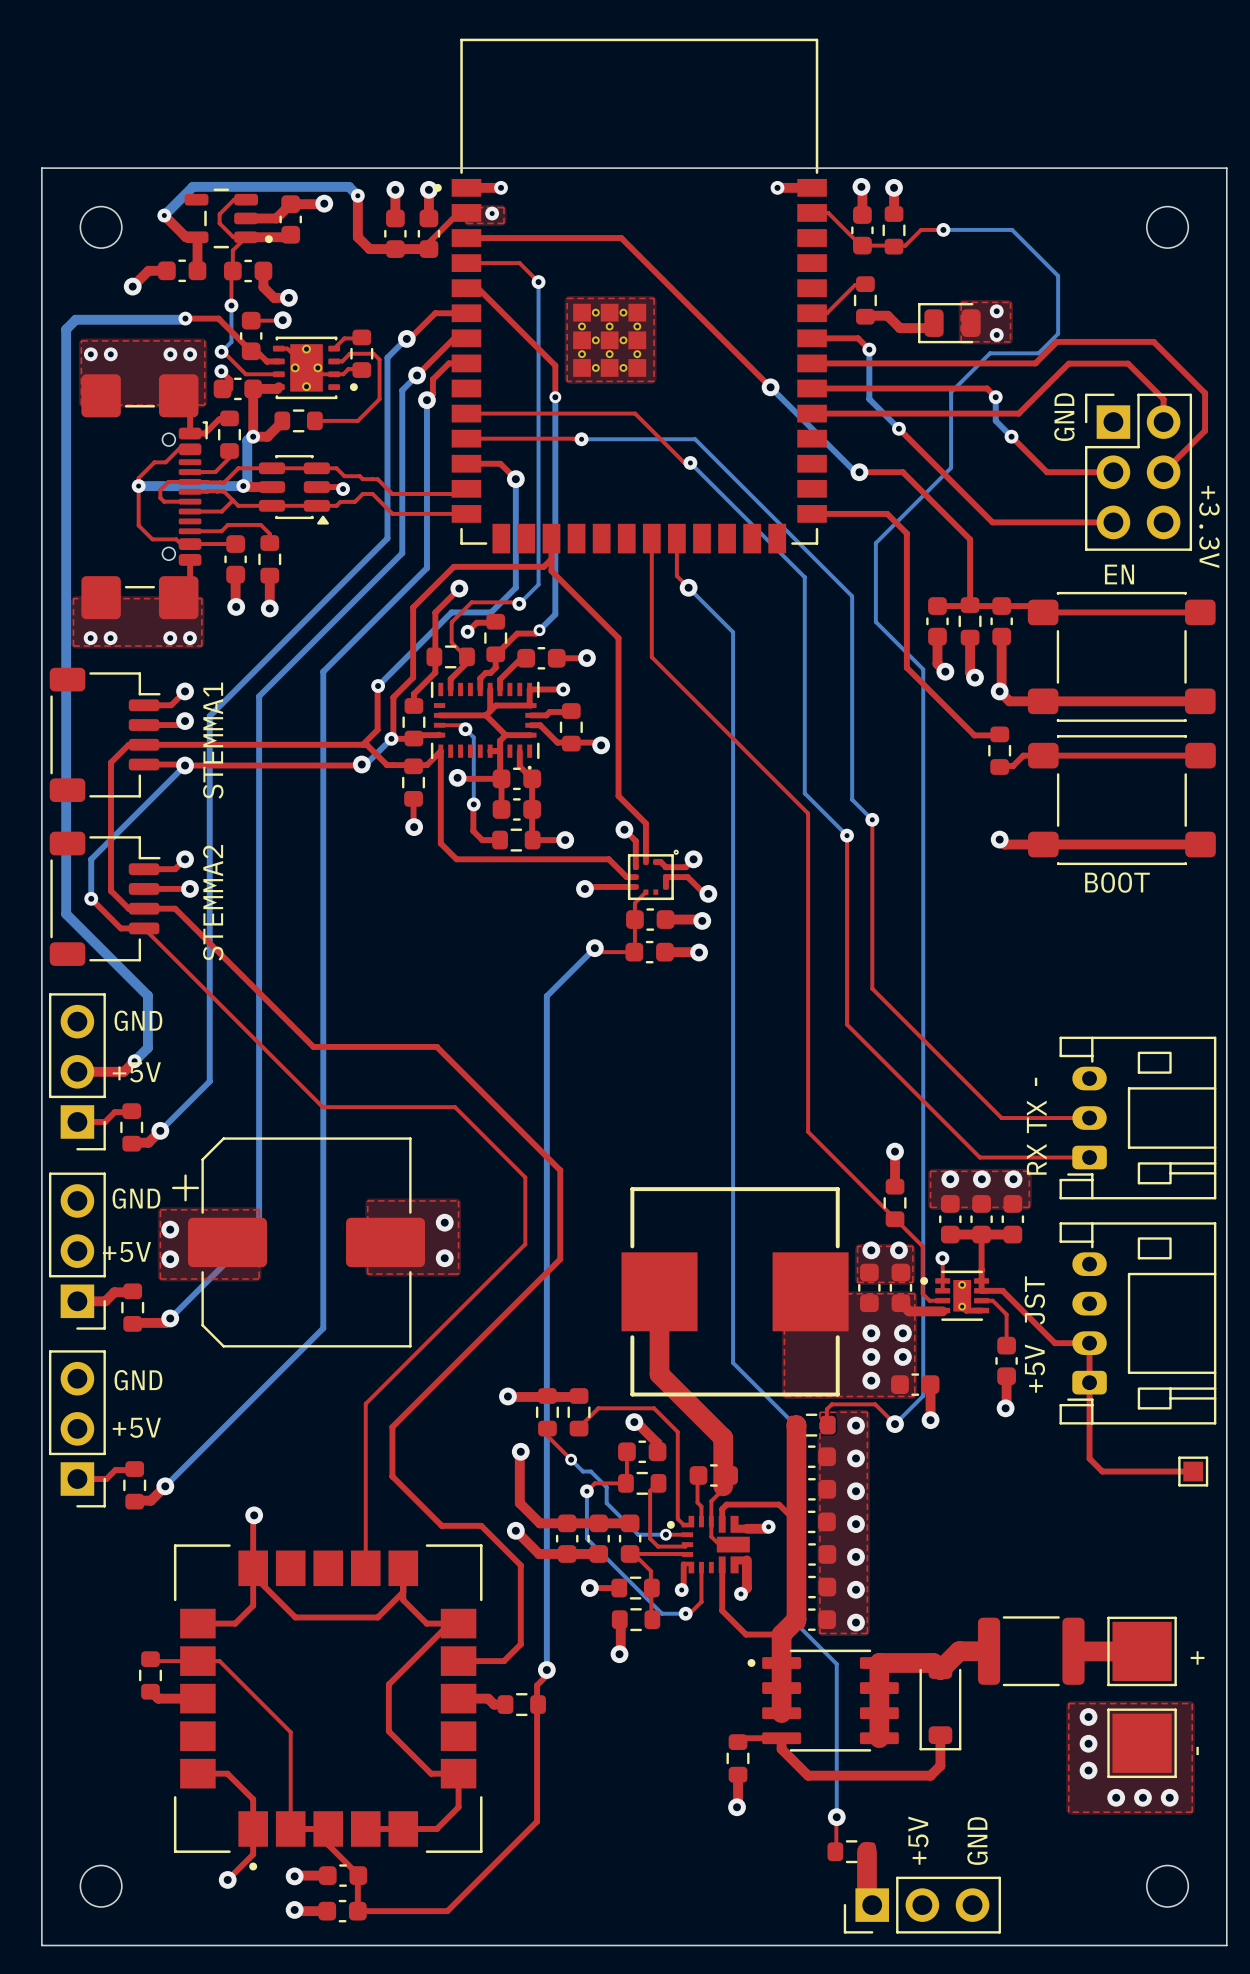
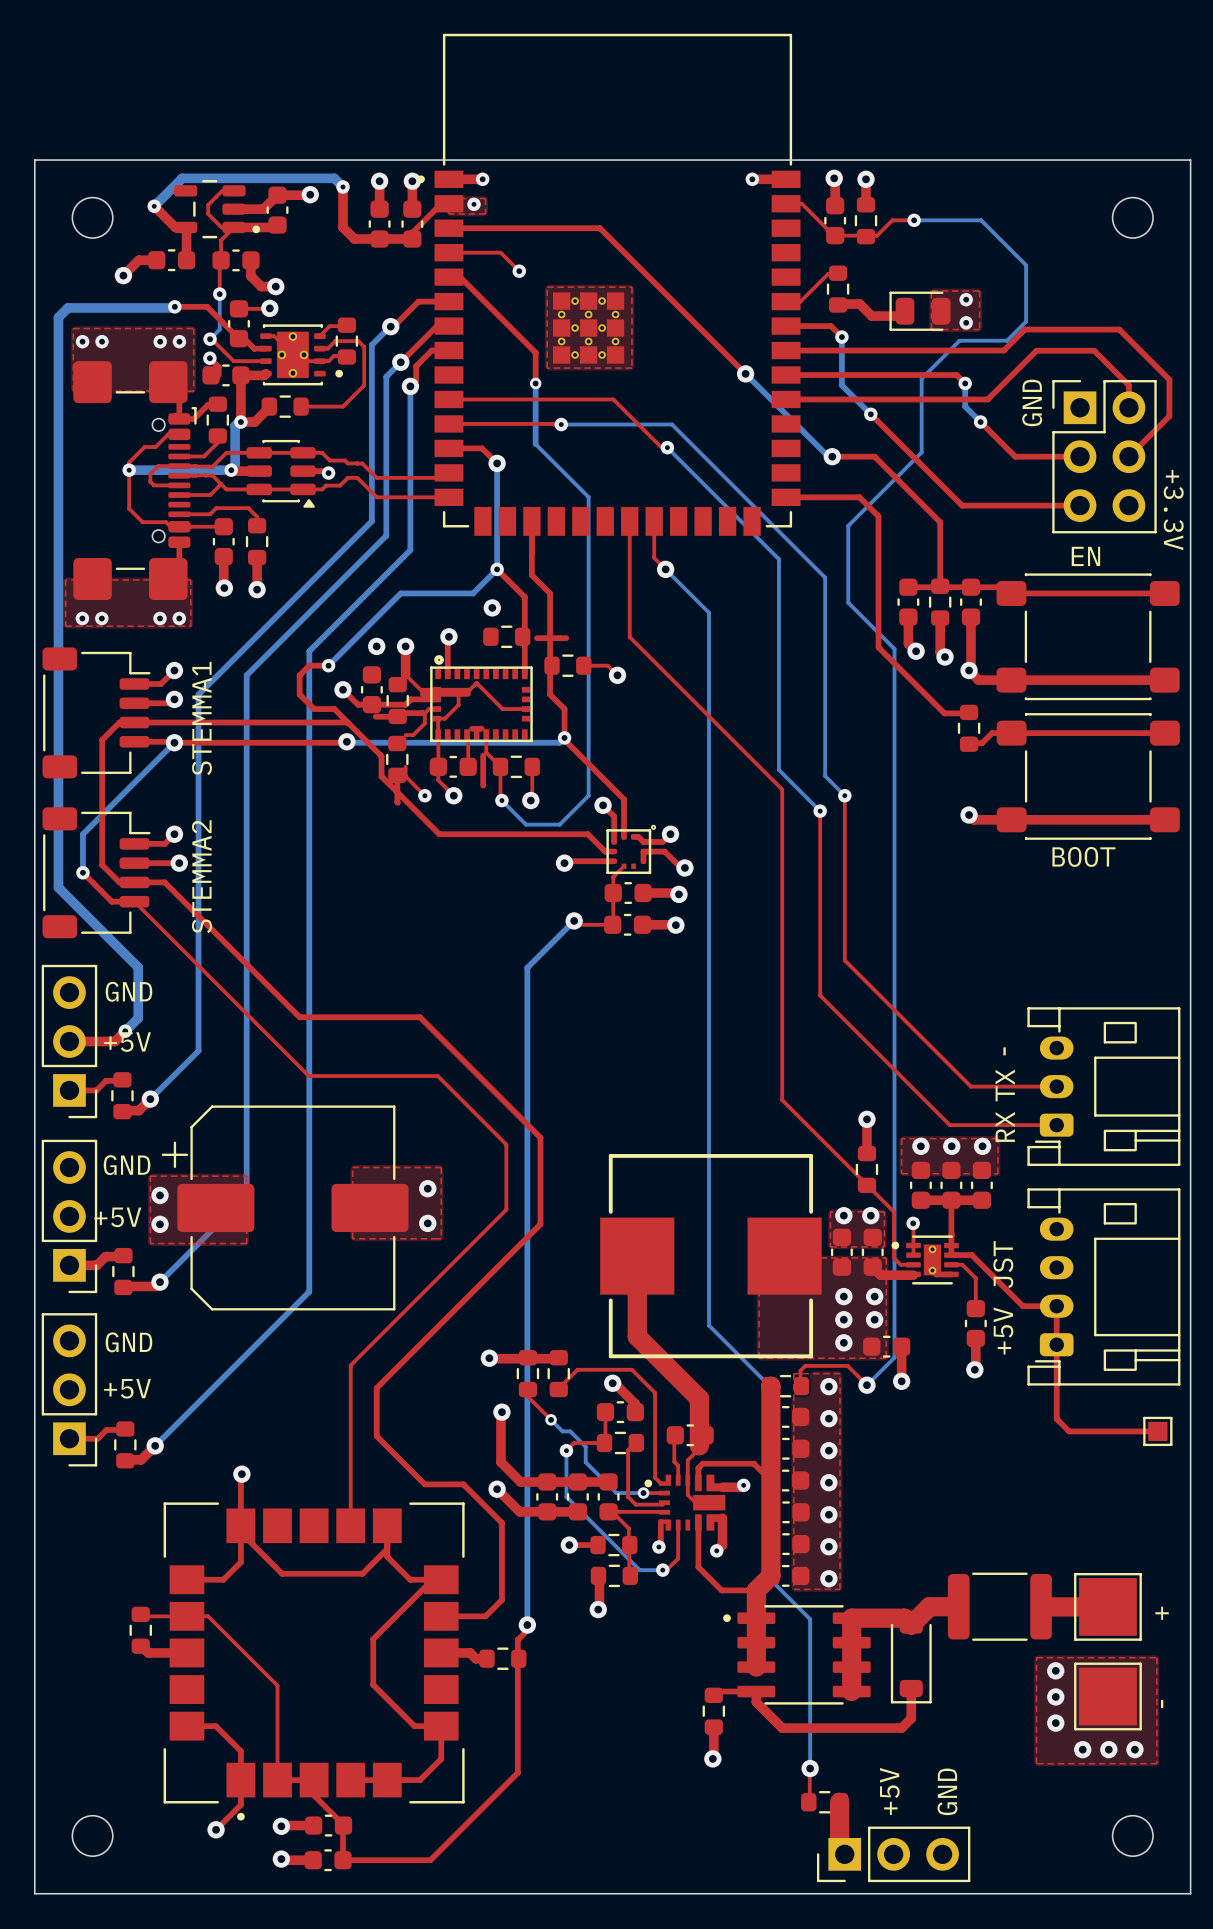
bottom track: (538, 282) (538, 584) (519, 603) -> none
bottom track: (555, 459) (555, 614) (539, 630) -> (535, 444) (588, 497) (588, 795) (559, 824) (526, 824) (501, 800)
top track: (551, 559) (543, 566) (453, 566) (413, 607) (413, 677) (393, 697) (393, 736) -> none
top track: (551, 571) (618, 638) (618, 796) -> (531, 553) (531, 575) (550, 593) (550, 694) (564, 709) (564, 739) (597, 772)
top track: none -> (497, 569) (524, 597) (524, 674)
top track: (459, 588) (435, 612) (435, 672) (413, 694) (413, 706) -> none
via: (459, 588) -> none
top track: (519, 603) (471, 602) (451, 622) (451, 642) (465, 656) -> (447, 674) (448, 636)
via position: (519, 603) -> (497, 569)
bottom track: (451, 612) (377, 686) -> (434, 593) (400, 593) (328, 665)
top track: (495, 622) (476, 622) (467, 631) -> none
via: none -> (492, 607)
top track: (539, 630) (536, 633) (517, 633) (495, 653) (495, 667) (480, 678) (480, 689) -> none
via: (539, 630) -> none
via: (467, 631) -> none
part: (495, 638) -> none
part footprint: [517, 647, 566, 670] -> [483, 625, 531, 649]
part: (450, 656) -> none
via: none -> (448, 636)
top track: (526, 658) (521, 658) (500, 679) (500, 689) -> none
via: (586, 658) -> none
top track: (465, 663) (450, 679) (450, 689) (450, 681) -> none
via: none -> (376, 646)
top track: none -> (405, 646) (405, 674) (420, 689) (469, 689) (476, 683) (502, 709) (526, 709)
via: none -> (405, 646)
part footprint: [430, 681, 540, 770] -> [430, 655, 533, 743]
top track: (377, 686) (377, 729) (362, 744) (366, 744) (387, 765) (392, 765) -> none
via position: (378, 686) -> (328, 665)
part: none -> (567, 665)
top track: none -> (583, 665) (607, 665) (617, 675)
top track: (490, 689) (490, 711) -> none
top track: (563, 689) (529, 689) (530, 705) (495, 705) (485, 715) (505, 735) -> none
via: (563, 689) -> none
via: none -> (617, 675)
top track: none -> (343, 689) (357, 704) (405, 704) (410, 699) (436, 699)
via: none -> (343, 689)
part: none -> (371, 689)
top track: none -> (458, 689) (458, 704) (444, 718) (436, 718) (438, 734)
top track: (571, 711) (549, 711) (546, 715) (530, 715) -> none
top track: (439, 725) (461, 725) (465, 729) -> none
top track: (530, 725) (540, 725) (557, 742) (598, 742) (601, 745) -> none
part: (571, 727) -> none
bottom track: (465, 729) (473, 737) (473, 804) -> none
via: (465, 729) -> none
top track: none -> (436, 709) (428, 709) (424, 713) (424, 723) (413, 735) (405, 735)
top track: (505, 735) (530, 735) -> none
top track: (505, 735) (500, 740) (501, 778) (457, 777) -> none
bottom track: (393, 736) (365, 764) (361, 764) -> none
via: (391, 738) -> none
via: (601, 745) -> none
top track: (519, 751) (519, 766) (532, 778) (531, 840) (565, 840) -> none
top track: none -> (467, 734) (468, 766)
top track: none -> (486, 734) (486, 752) (500, 766) (501, 800)
top track: none -> (438, 734) (438, 780) (453, 795)
via: none -> (564, 737)
bottom track: none -> (564, 739) (564, 737) (559, 742) (347, 742)
top track: (393, 765) (426, 765) (440, 751) (440, 843) -> (328, 665) (309, 665) (299, 675) (299, 694) (314, 709) (334, 709) (381, 756) (381, 776) (423, 818)
via: (457, 777) -> none
part: (516, 778) -> none
top track: none -> (405, 766) (405, 776) (424, 795)
part: none -> (453, 766)
part: none -> (516, 766)
top track: none -> (532, 766) (530, 800)
top track: (473, 804) (473, 831) (482, 840) (501, 840) -> none
via position: (473, 804) -> (453, 795)
part: (516, 809) -> none
via: none -> (424, 795)
via: none -> (501, 800)
via: (414, 827) -> none
part: (516, 840) -> none
via position: (565, 840) -> (530, 800)

